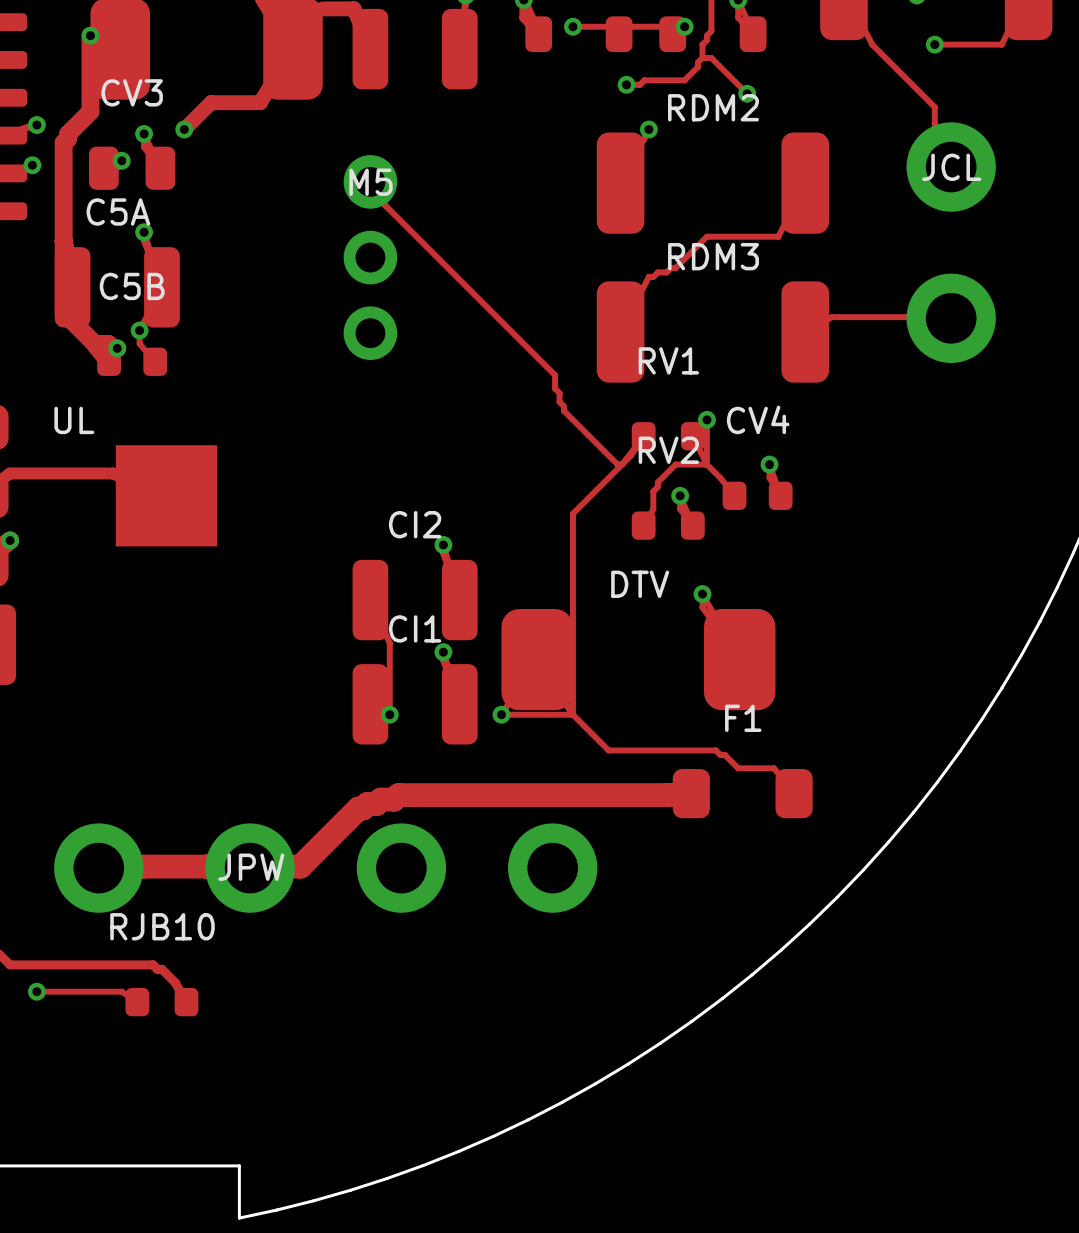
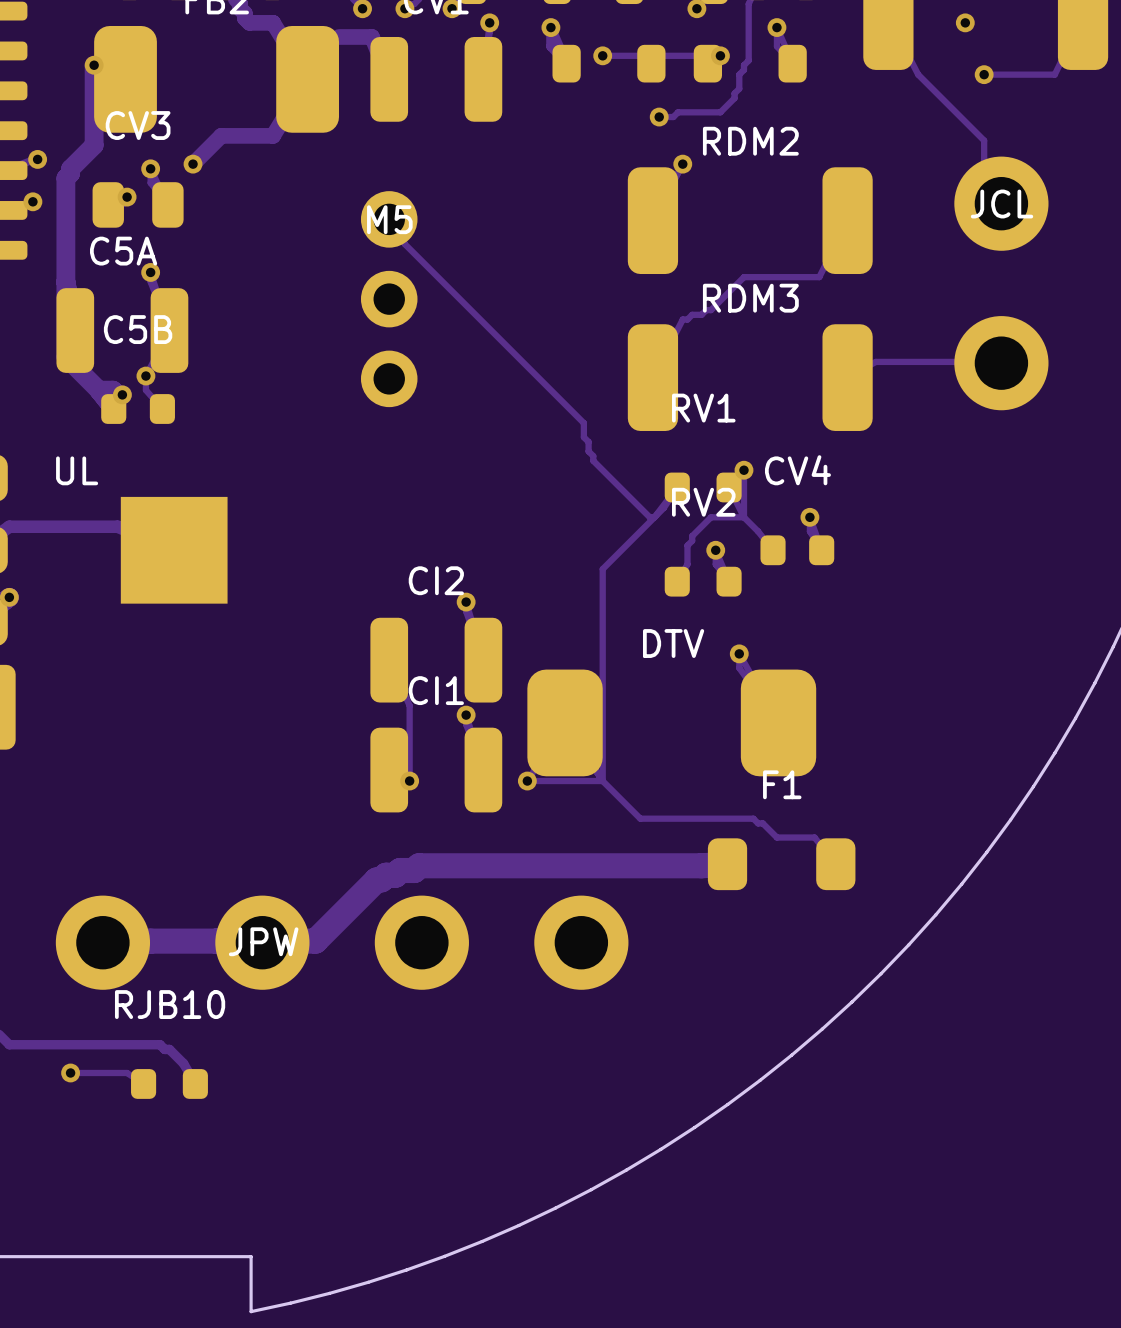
track: (702, 58) (711, 58) (747, 93) -> none
via: (747, 93) -> none
track: (36, 991) (68, 991) -> none
via position: (36, 991) -> (70, 1072)

